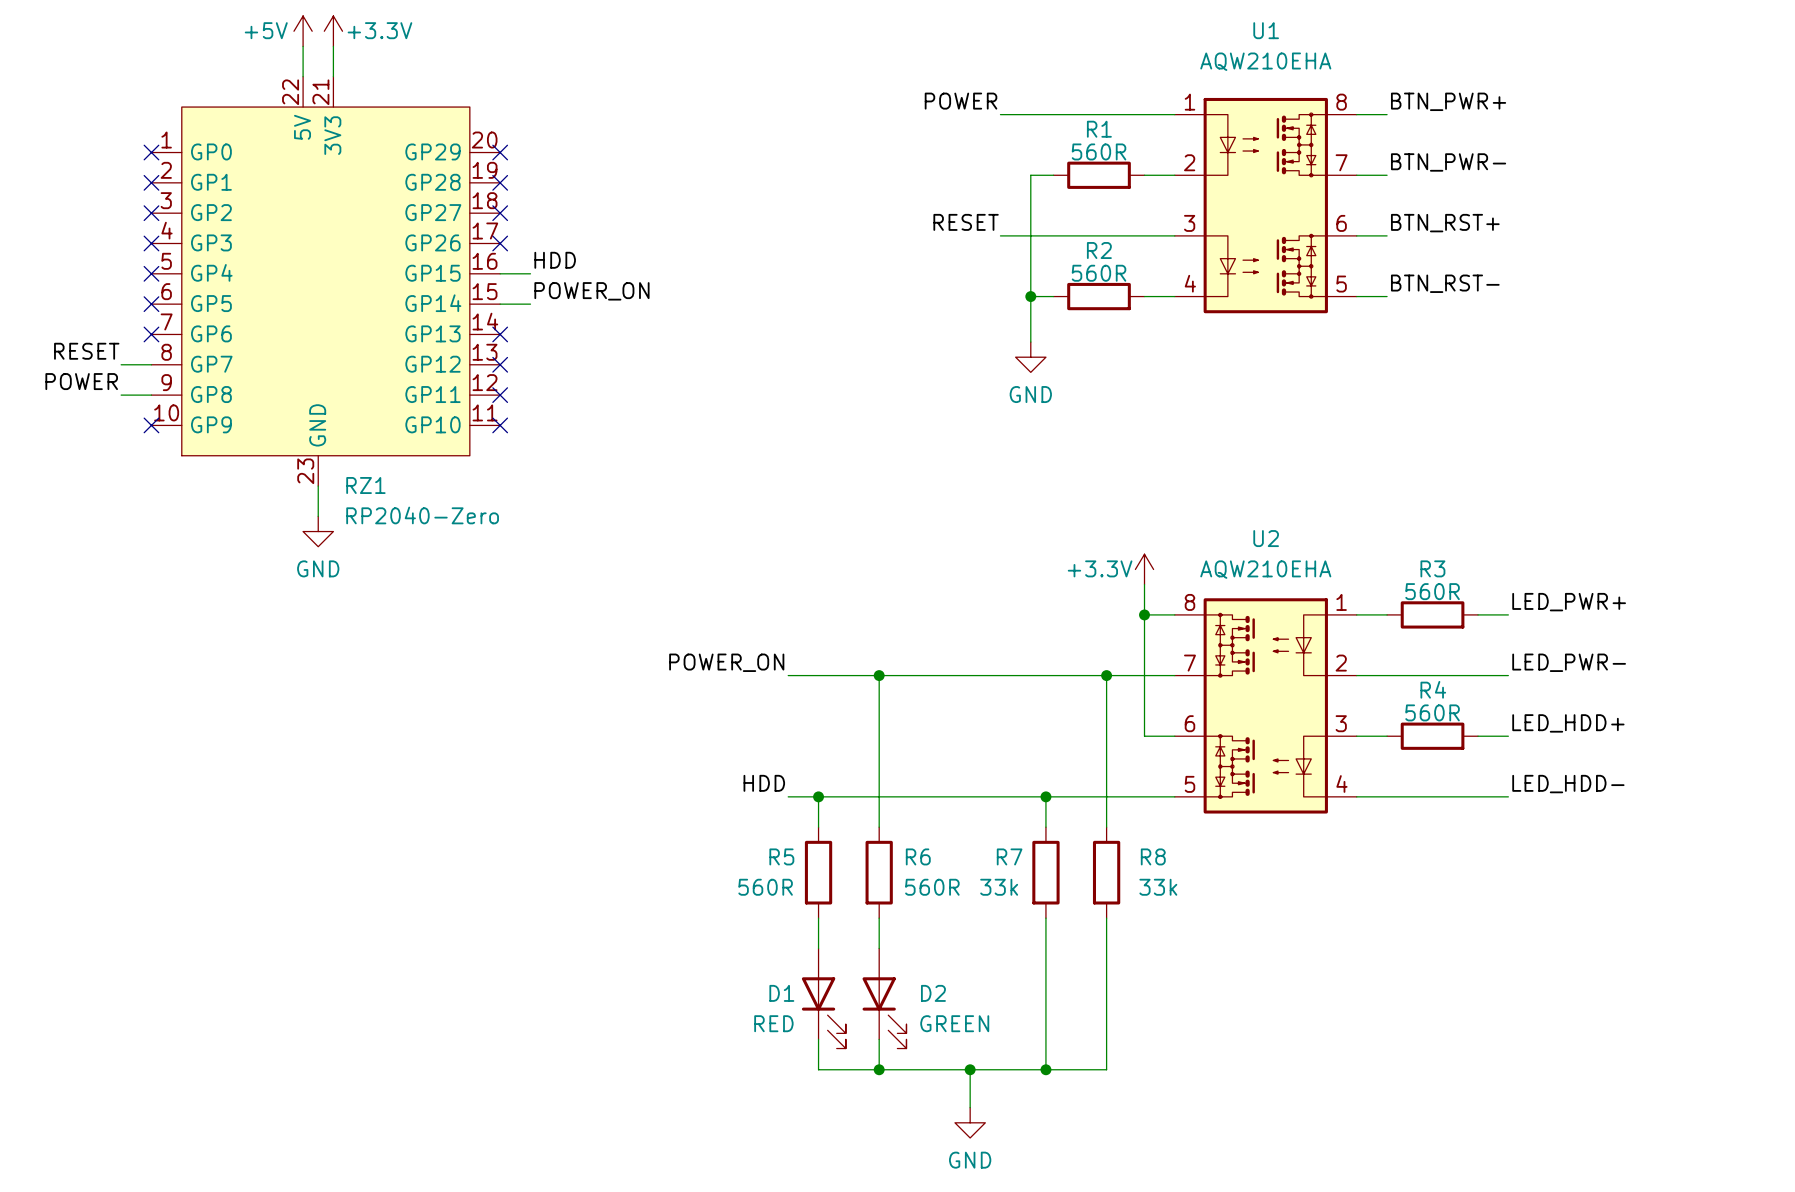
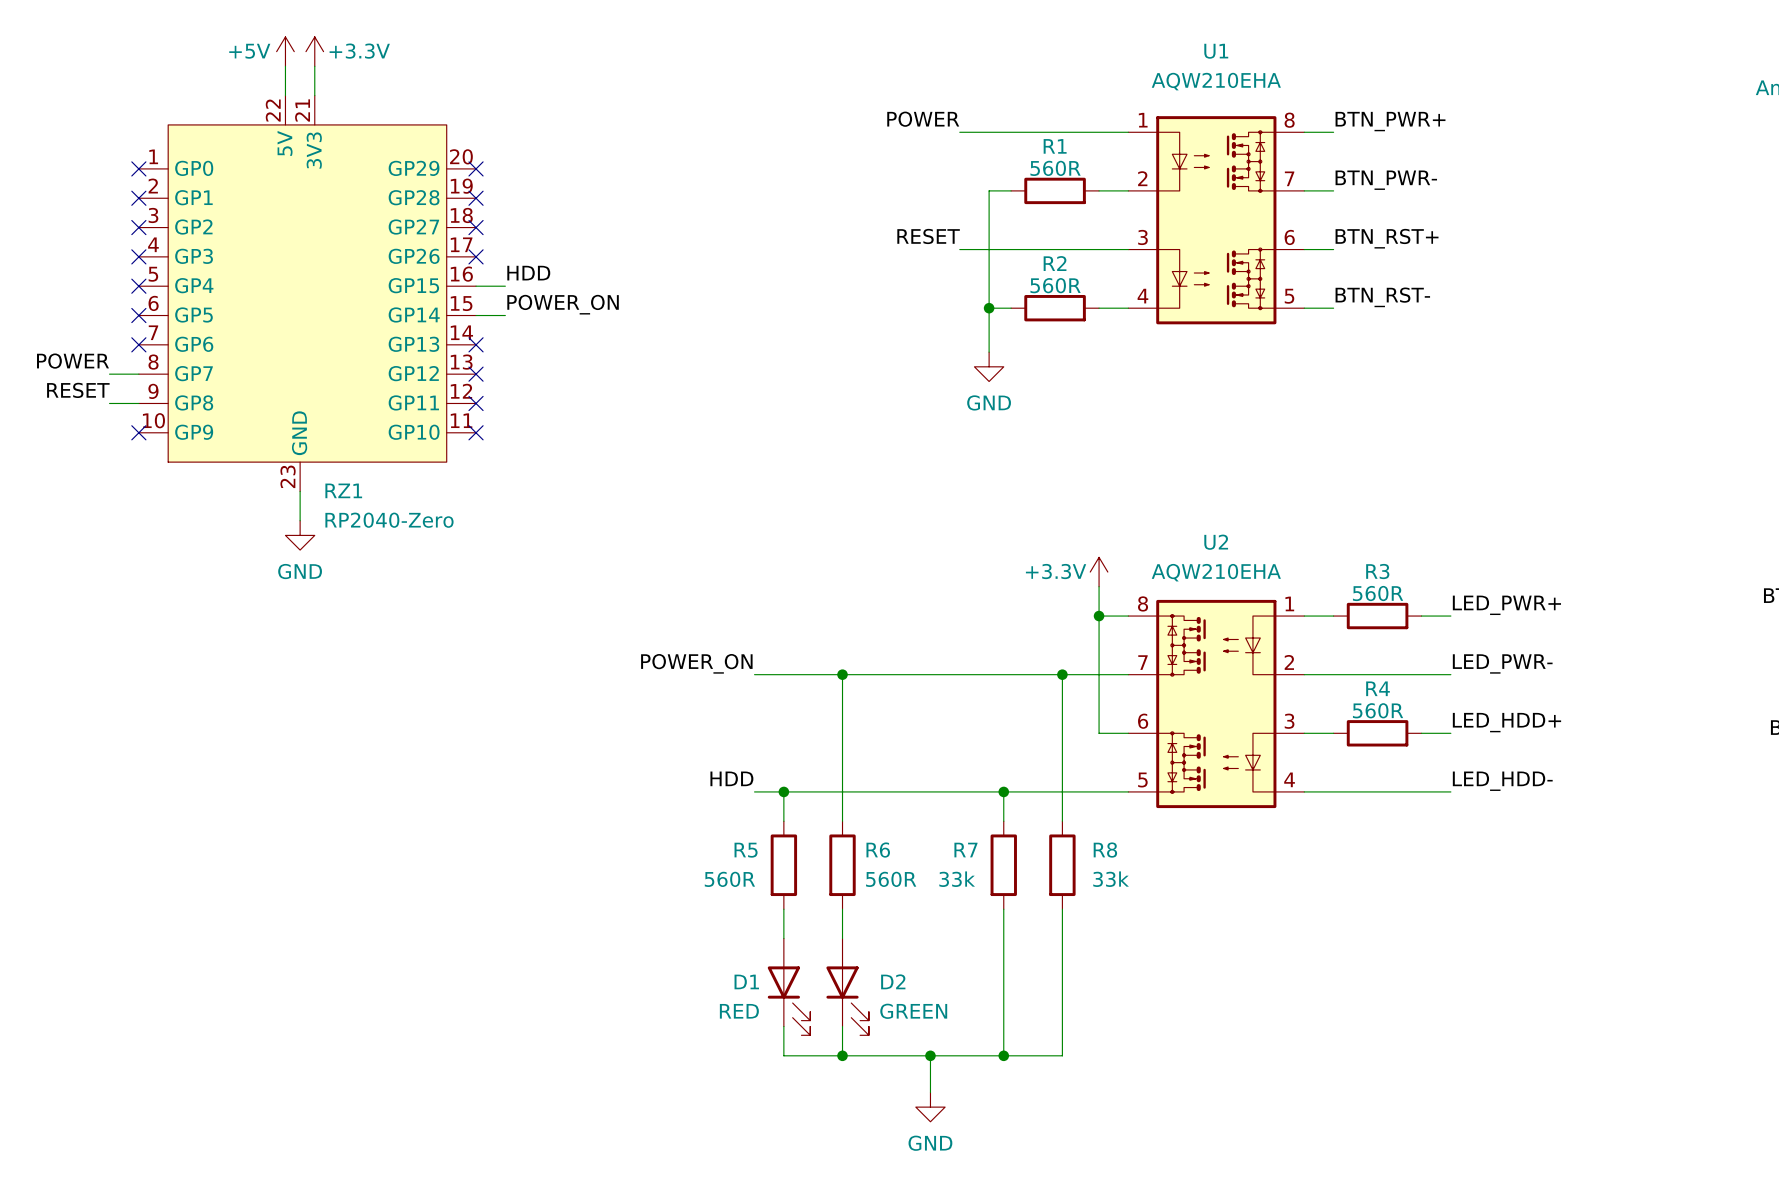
label: RESET (86, 351) -> POWER (72, 361)
label: POWER (81, 381) -> RESET (78, 390)

